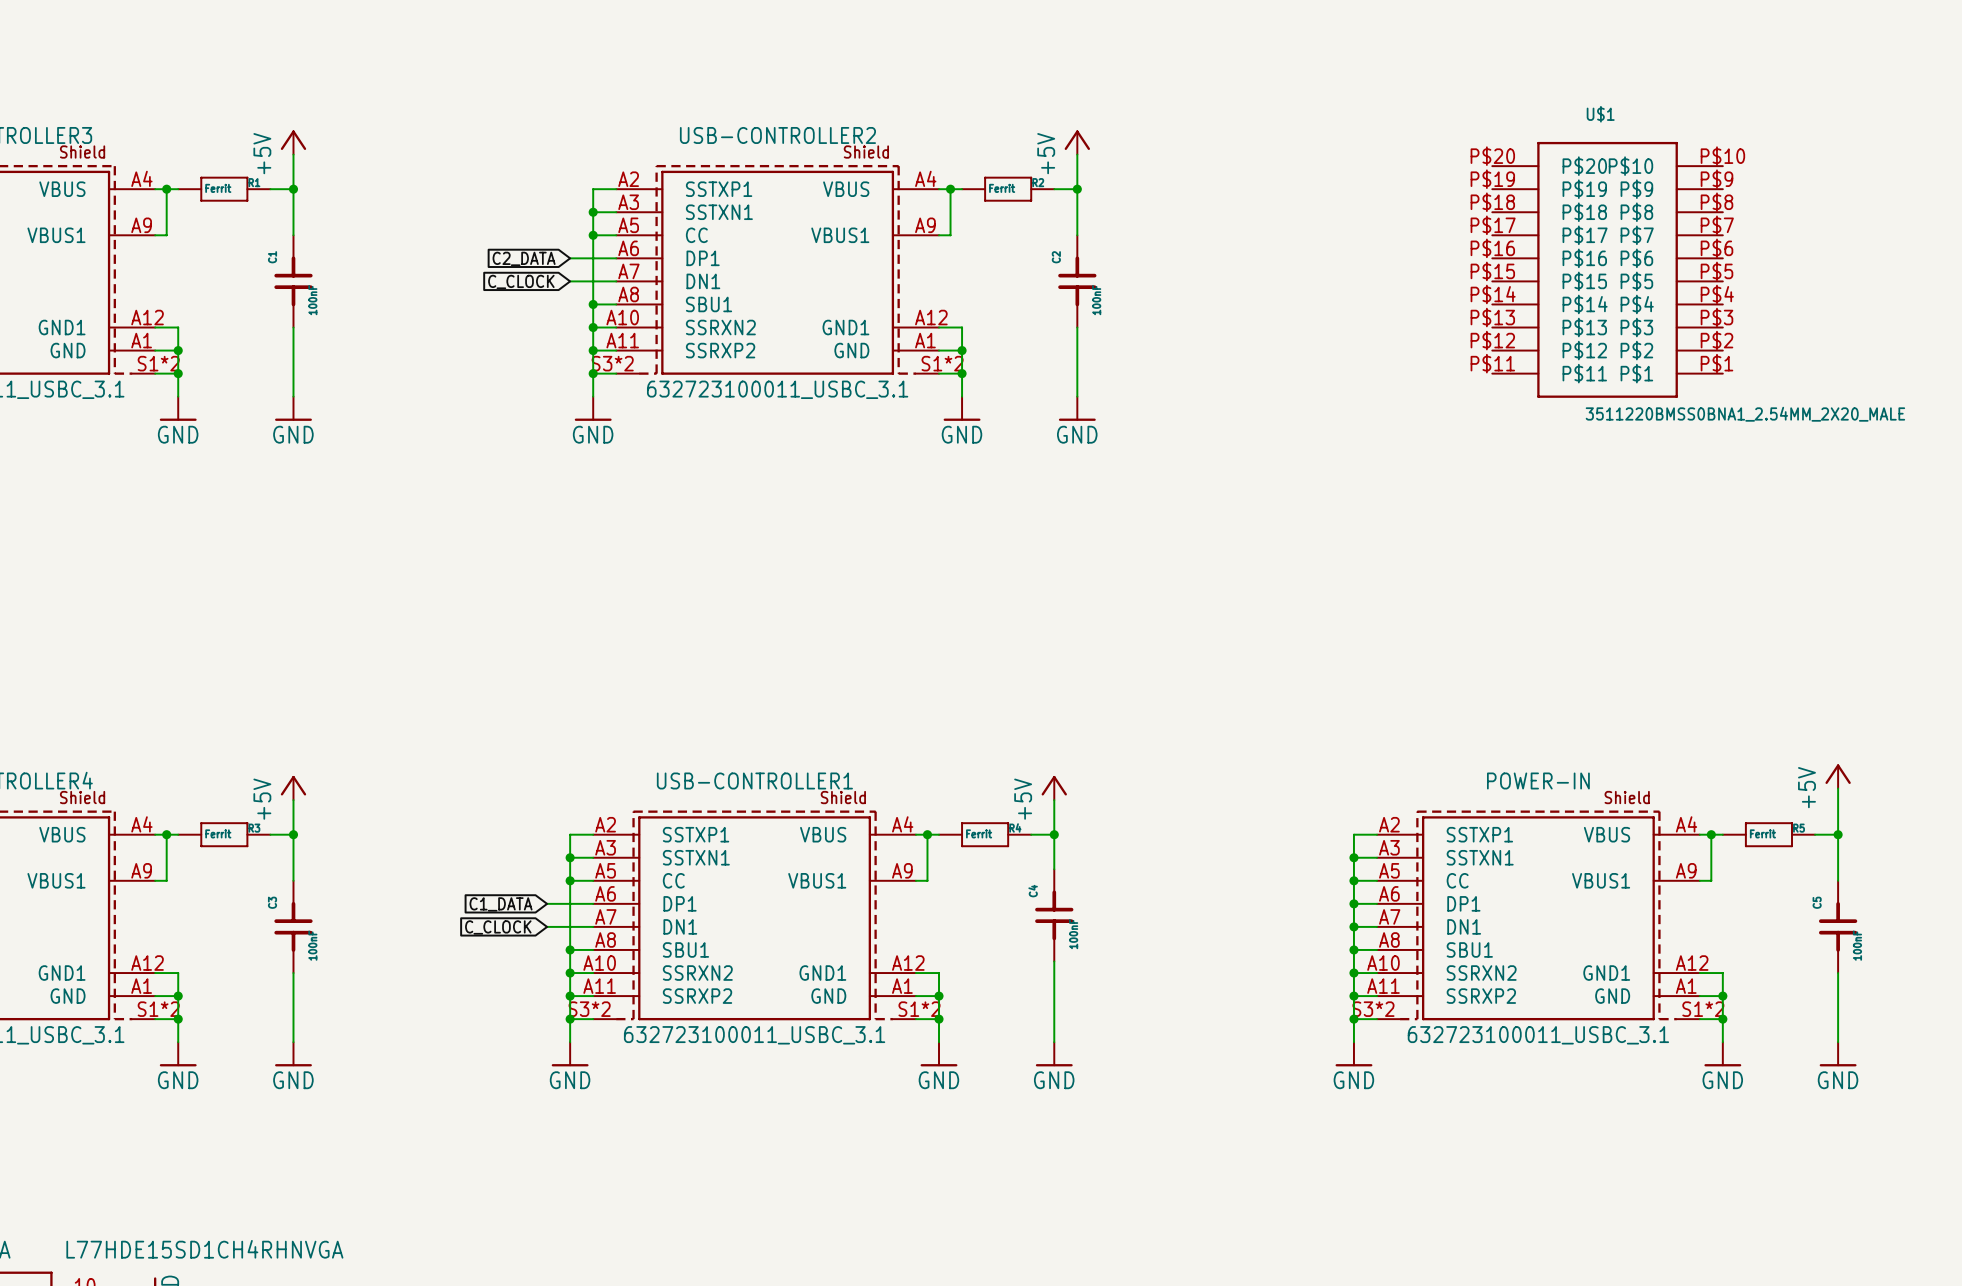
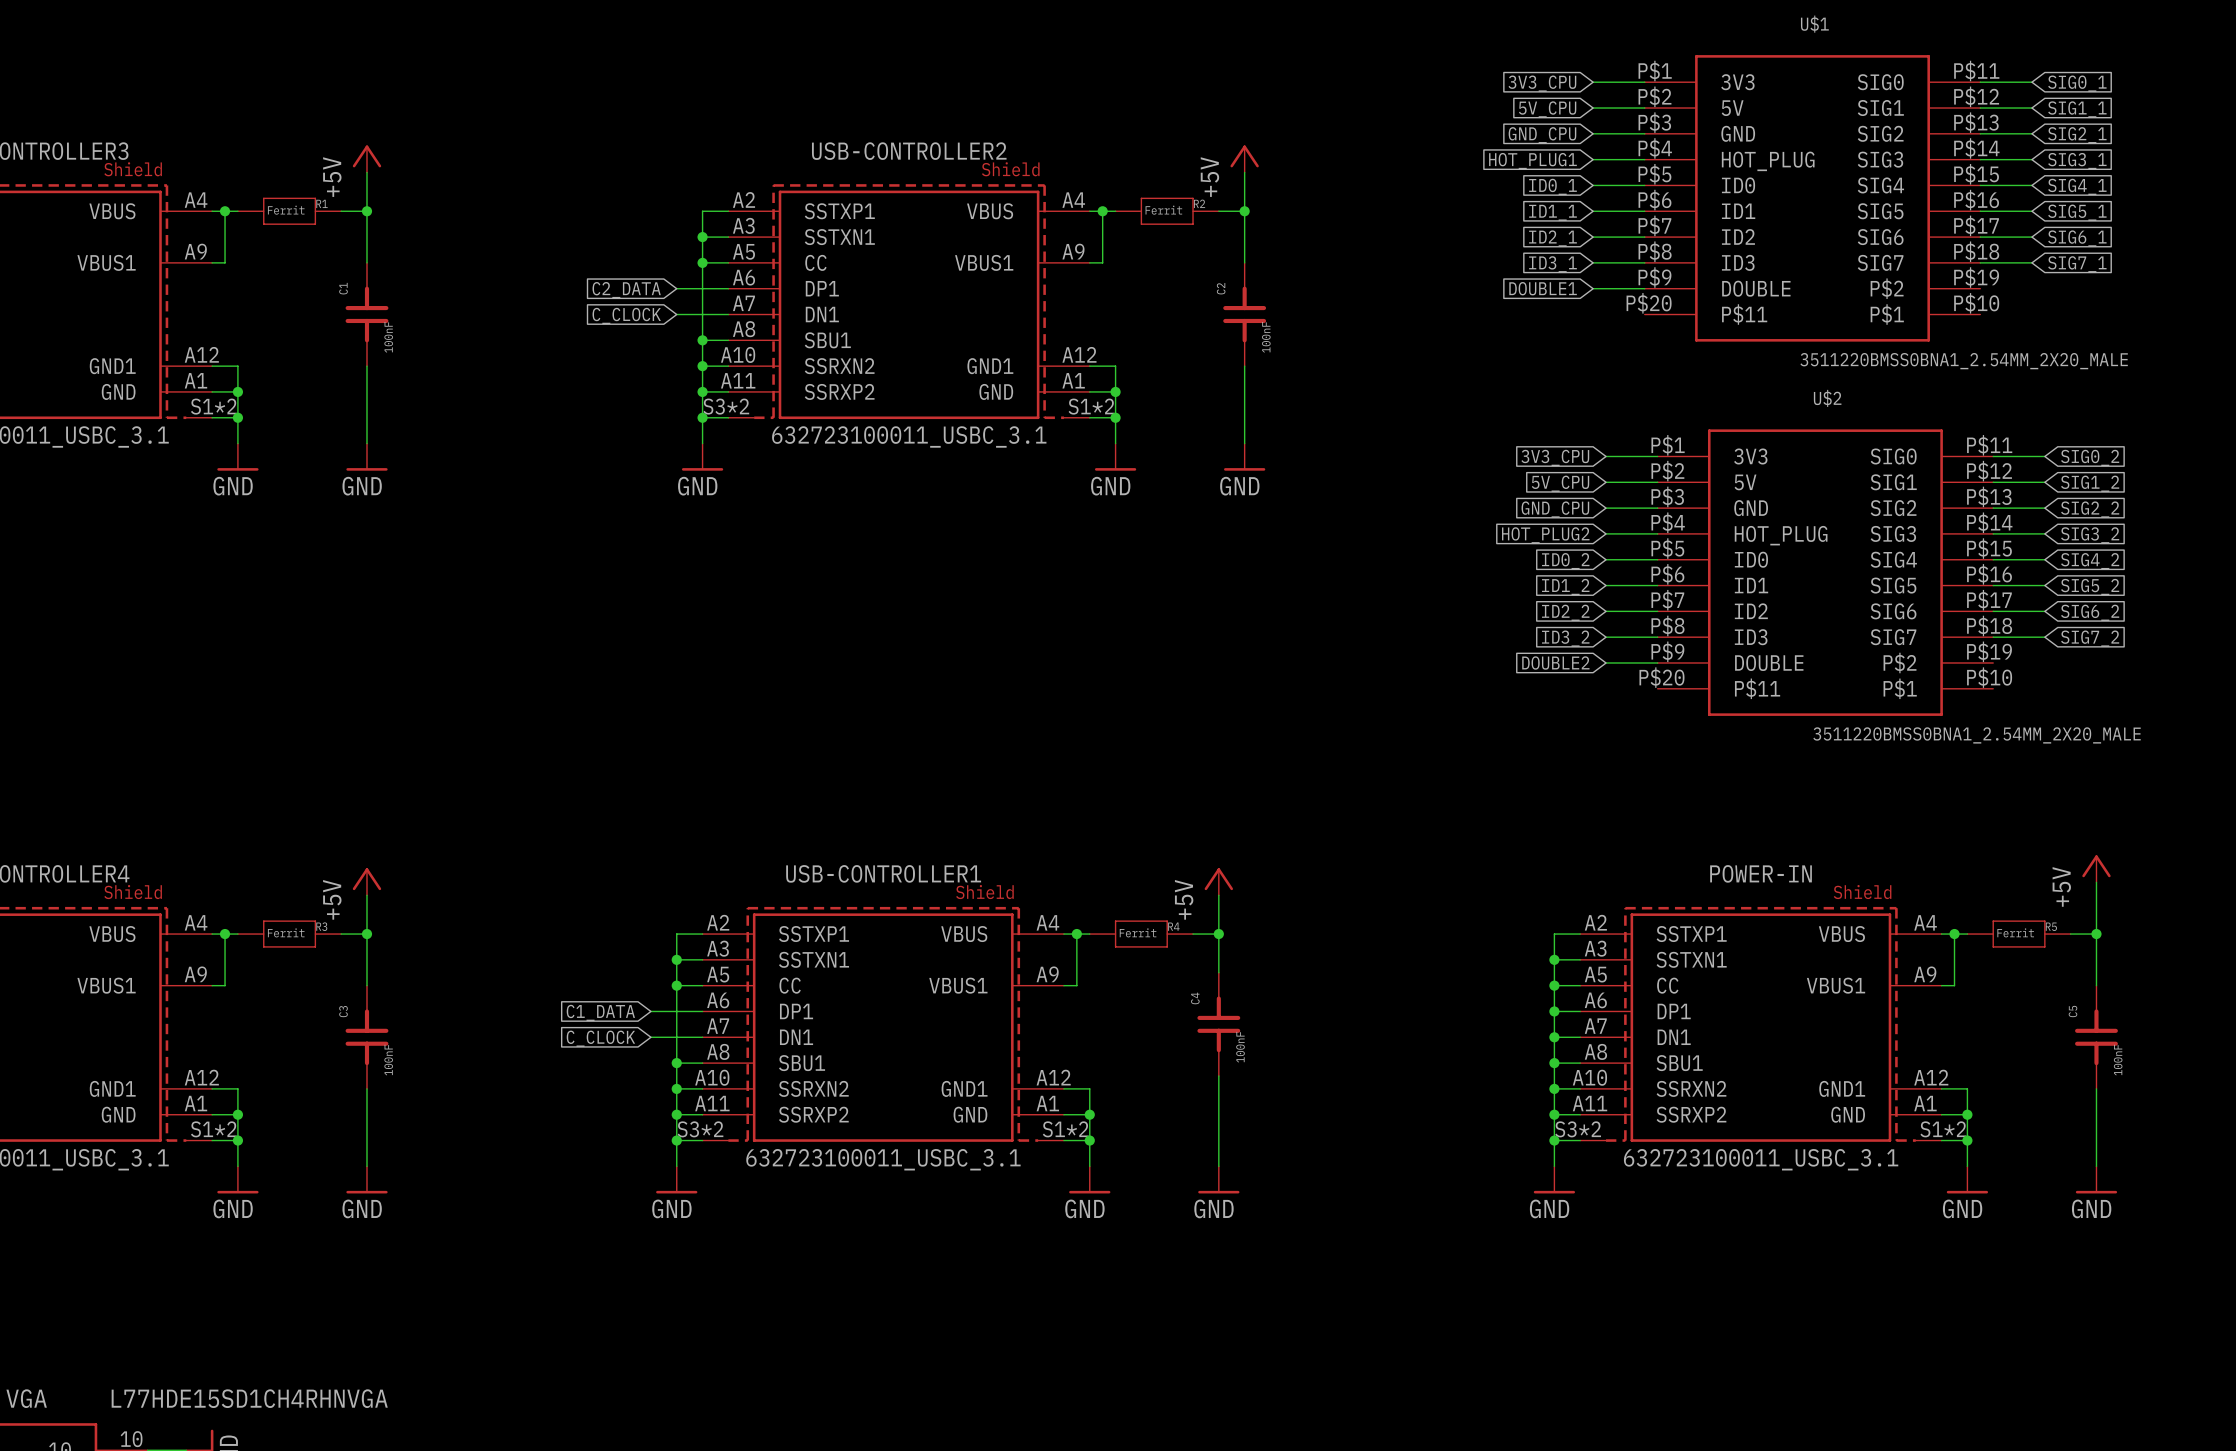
wire: none -> (1593, 82) (1644, 82)
wire: none -> (1980, 82) (2031, 82)
global label: none -> 3V3_CPU (1542, 83)
global label: none -> SIG0_1 (2077, 83)
wire: none -> (1593, 108) (1644, 108)
wire: none -> (1980, 108) (2031, 108)
global label: none -> 5V_CPU (1547, 109)
global label: none -> SIG1_1 (2077, 109)
global label: none -> GND_CPU (1542, 135)
wire: none -> (1593, 133) (1644, 133)
wire: none -> (1980, 133) (2031, 133)
global label: none -> SIG2_1 (2077, 135)
U$1 symbol: [1492, 141, 1723, 398] -> [1644, 55, 1981, 342]
global label: none -> HOT_PLUG1 (1532, 161)
wire: none -> (1593, 159) (1644, 159)
wire: none -> (1980, 159) (2031, 159)
global label: none -> SIG3_1 (2077, 161)
global label: none -> ID0_1 (1552, 186)
wire: none -> (1593, 185) (1644, 185)
wire: none -> (1980, 185) (2031, 185)
global label: none -> SIG4_1 (2077, 186)
global label: none -> ID1_1 (1552, 212)
wire: none -> (1593, 211) (1644, 211)
wire: none -> (1980, 211) (2031, 211)
global label: none -> SIG5_1 (2077, 212)
global label: none -> ID2_1 (1552, 238)
wire: none -> (1593, 237) (1644, 237)
wire: none -> (1980, 237) (2031, 237)
global label: none -> SIG6_1 (2077, 238)
global label: none -> ID3_1 (1552, 264)
wire: none -> (1593, 262) (1644, 262)
wire: none -> (1980, 262) (2031, 262)
global label: none -> SIG7_1 (2077, 264)
global label: none -> DOUBLE1 (1543, 288)
wire: none -> (1593, 288) (1644, 288)
global label: none -> 3V3_CPU (1555, 457)
wire: none -> (1606, 456) (1657, 456)
wire: none -> (1993, 456) (2044, 456)
global label: none -> SIG0_2 (2090, 457)
global label: none -> 5V_CPU (1560, 483)
wire: none -> (1606, 482) (1657, 482)
wire: none -> (1993, 482) (2044, 482)
global label: none -> SIG1_2 (2090, 483)
global label: none -> GND_CPU (1555, 509)
wire: none -> (1606, 508) (1657, 508)
wire: none -> (1993, 508) (2044, 508)
global label: none -> SIG2_2 (2090, 509)
global label: none -> HOT_PLUG2 (1545, 535)
wire: none -> (1606, 533) (1657, 533)
wire: none -> (1993, 533) (2044, 533)
global label: none -> SIG3_2 (2090, 535)
global label: none -> ID0_2 (1565, 561)
wire: none -> (1606, 559) (1657, 559)
wire: none -> (1993, 559) (2044, 559)
global label: none -> SIG4_2 (2090, 561)
U$2: none -> 3511220BMSS0BNA1_2.54MM_2X20_MALE (1825, 572)
wire: none -> (1606, 585) (1657, 585)
wire: none -> (1993, 585) (2044, 585)
global label: none -> ID1_2 (1565, 587)
global label: none -> SIG5_2 (2090, 587)
wire: none -> (1606, 611) (1657, 611)
wire: none -> (1993, 611) (2044, 611)
global label: none -> ID2_2 (1565, 612)
global label: none -> SIG6_2 (2090, 612)
wire: none -> (1606, 637) (1657, 637)
wire: none -> (1993, 637) (2044, 637)
global label: none -> ID3_2 (1565, 638)
global label: none -> SIG7_2 (2090, 638)
global label: none -> DOUBLE2 (1555, 662)
wire: none -> (1606, 662) (1657, 662)

